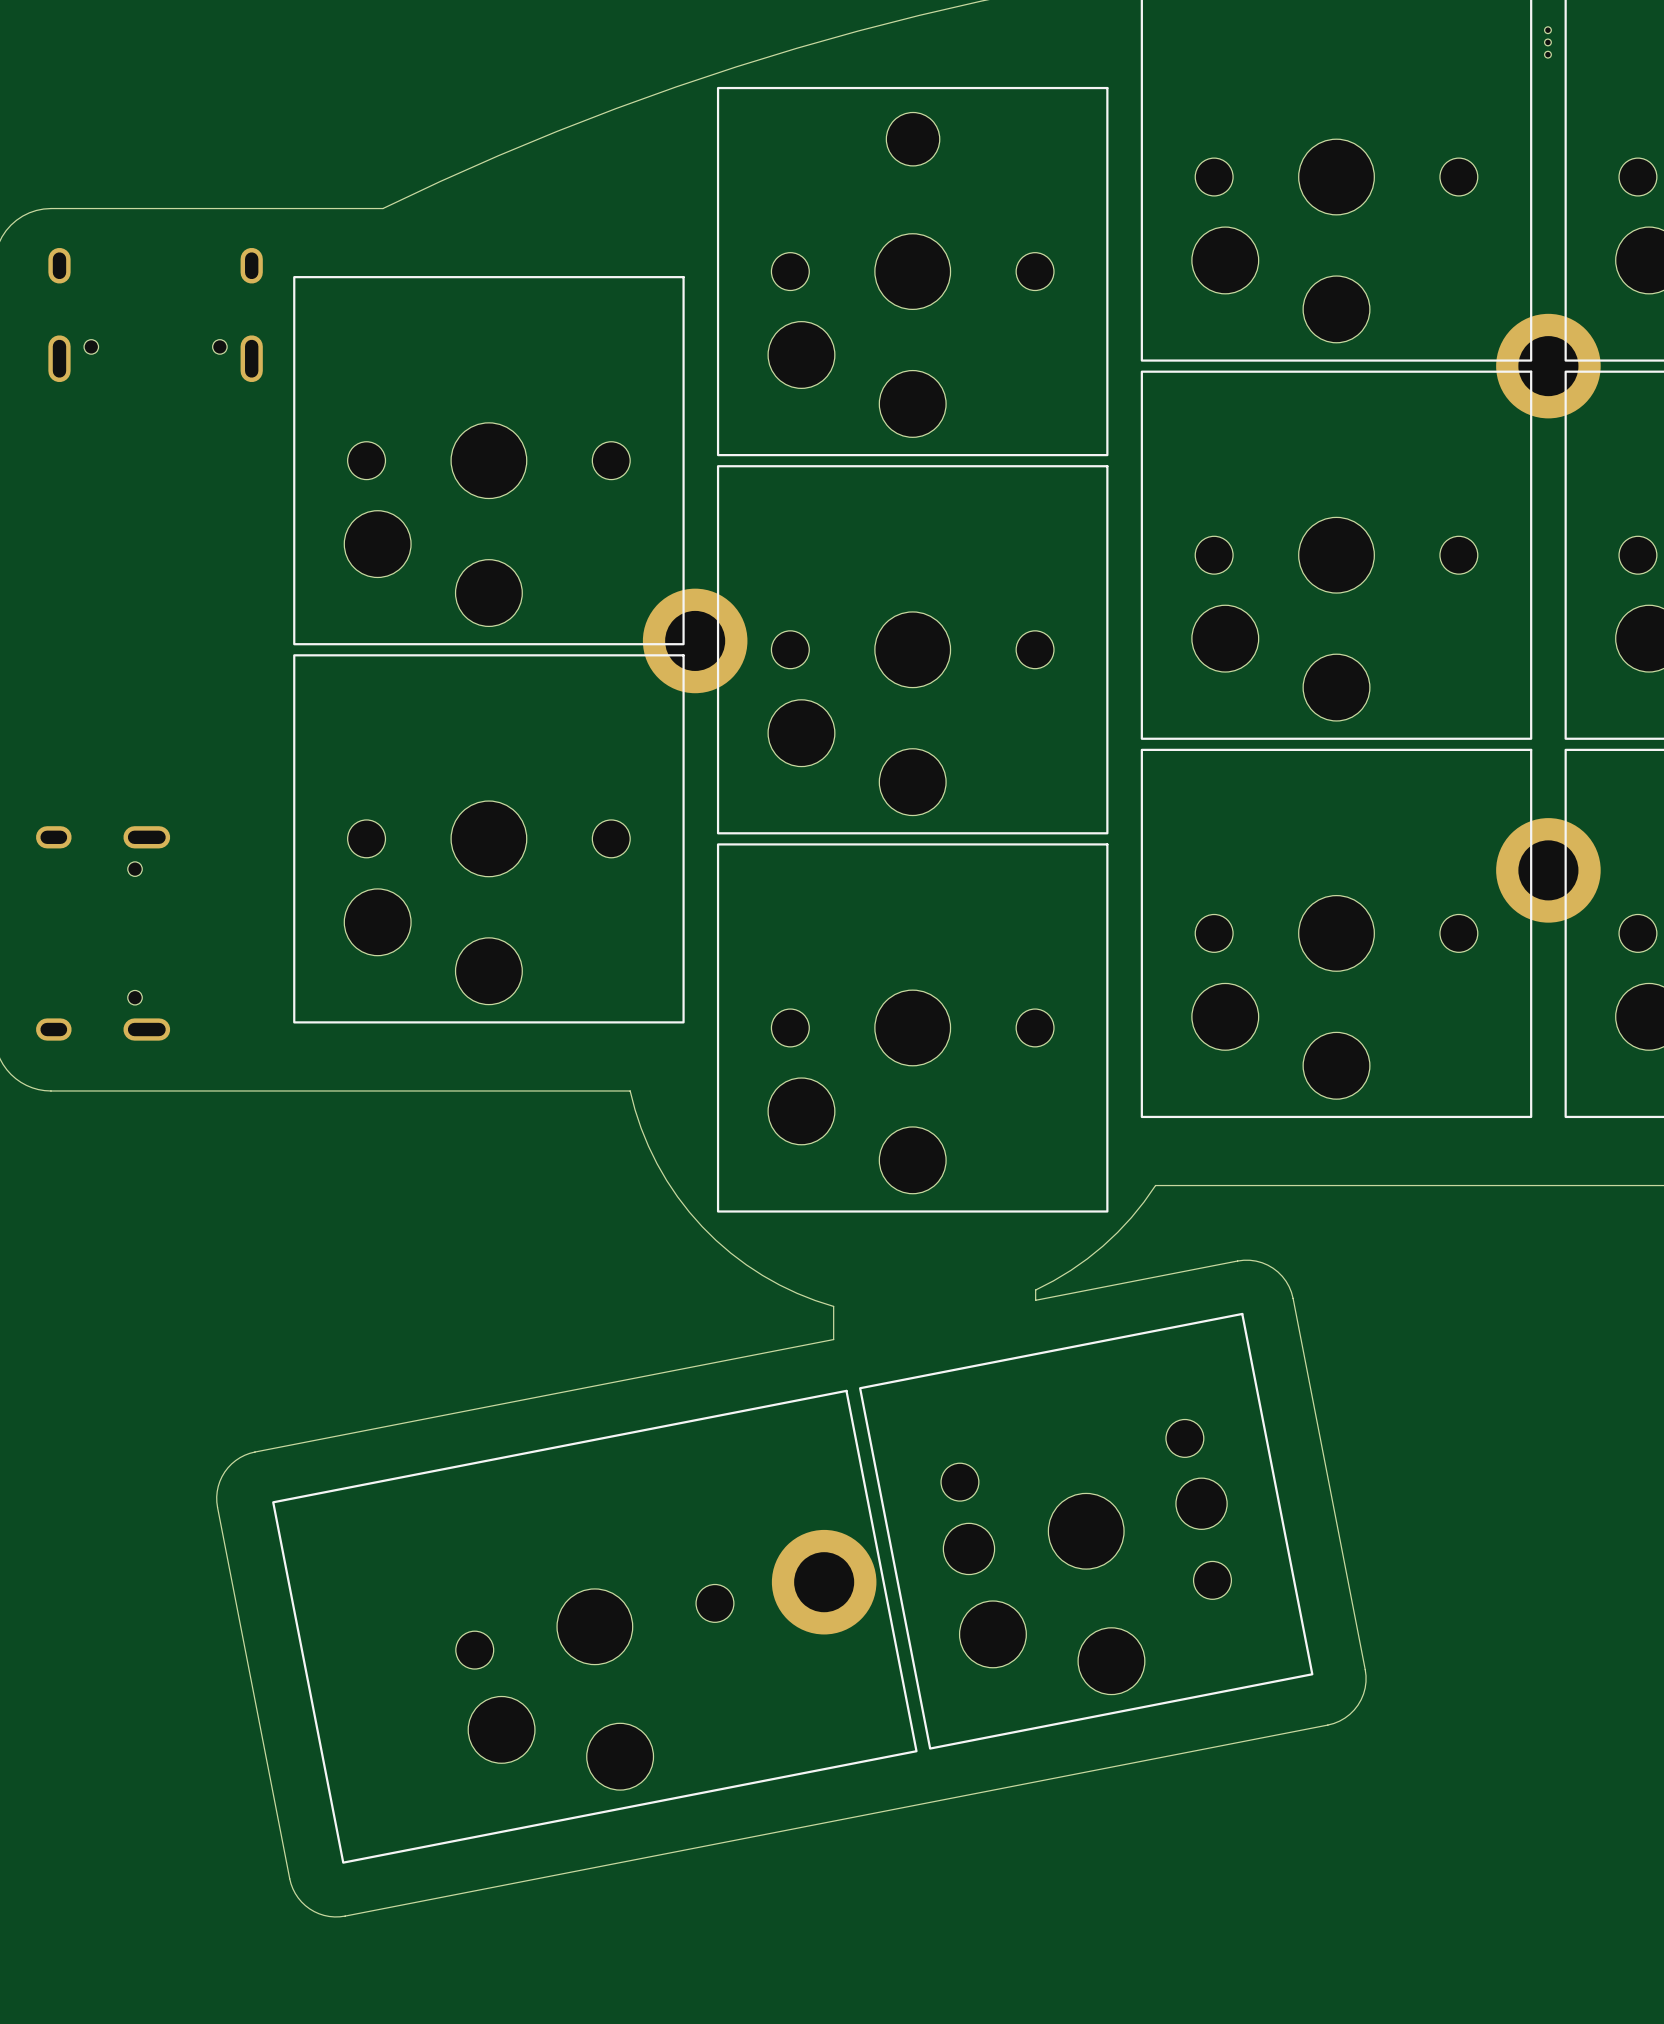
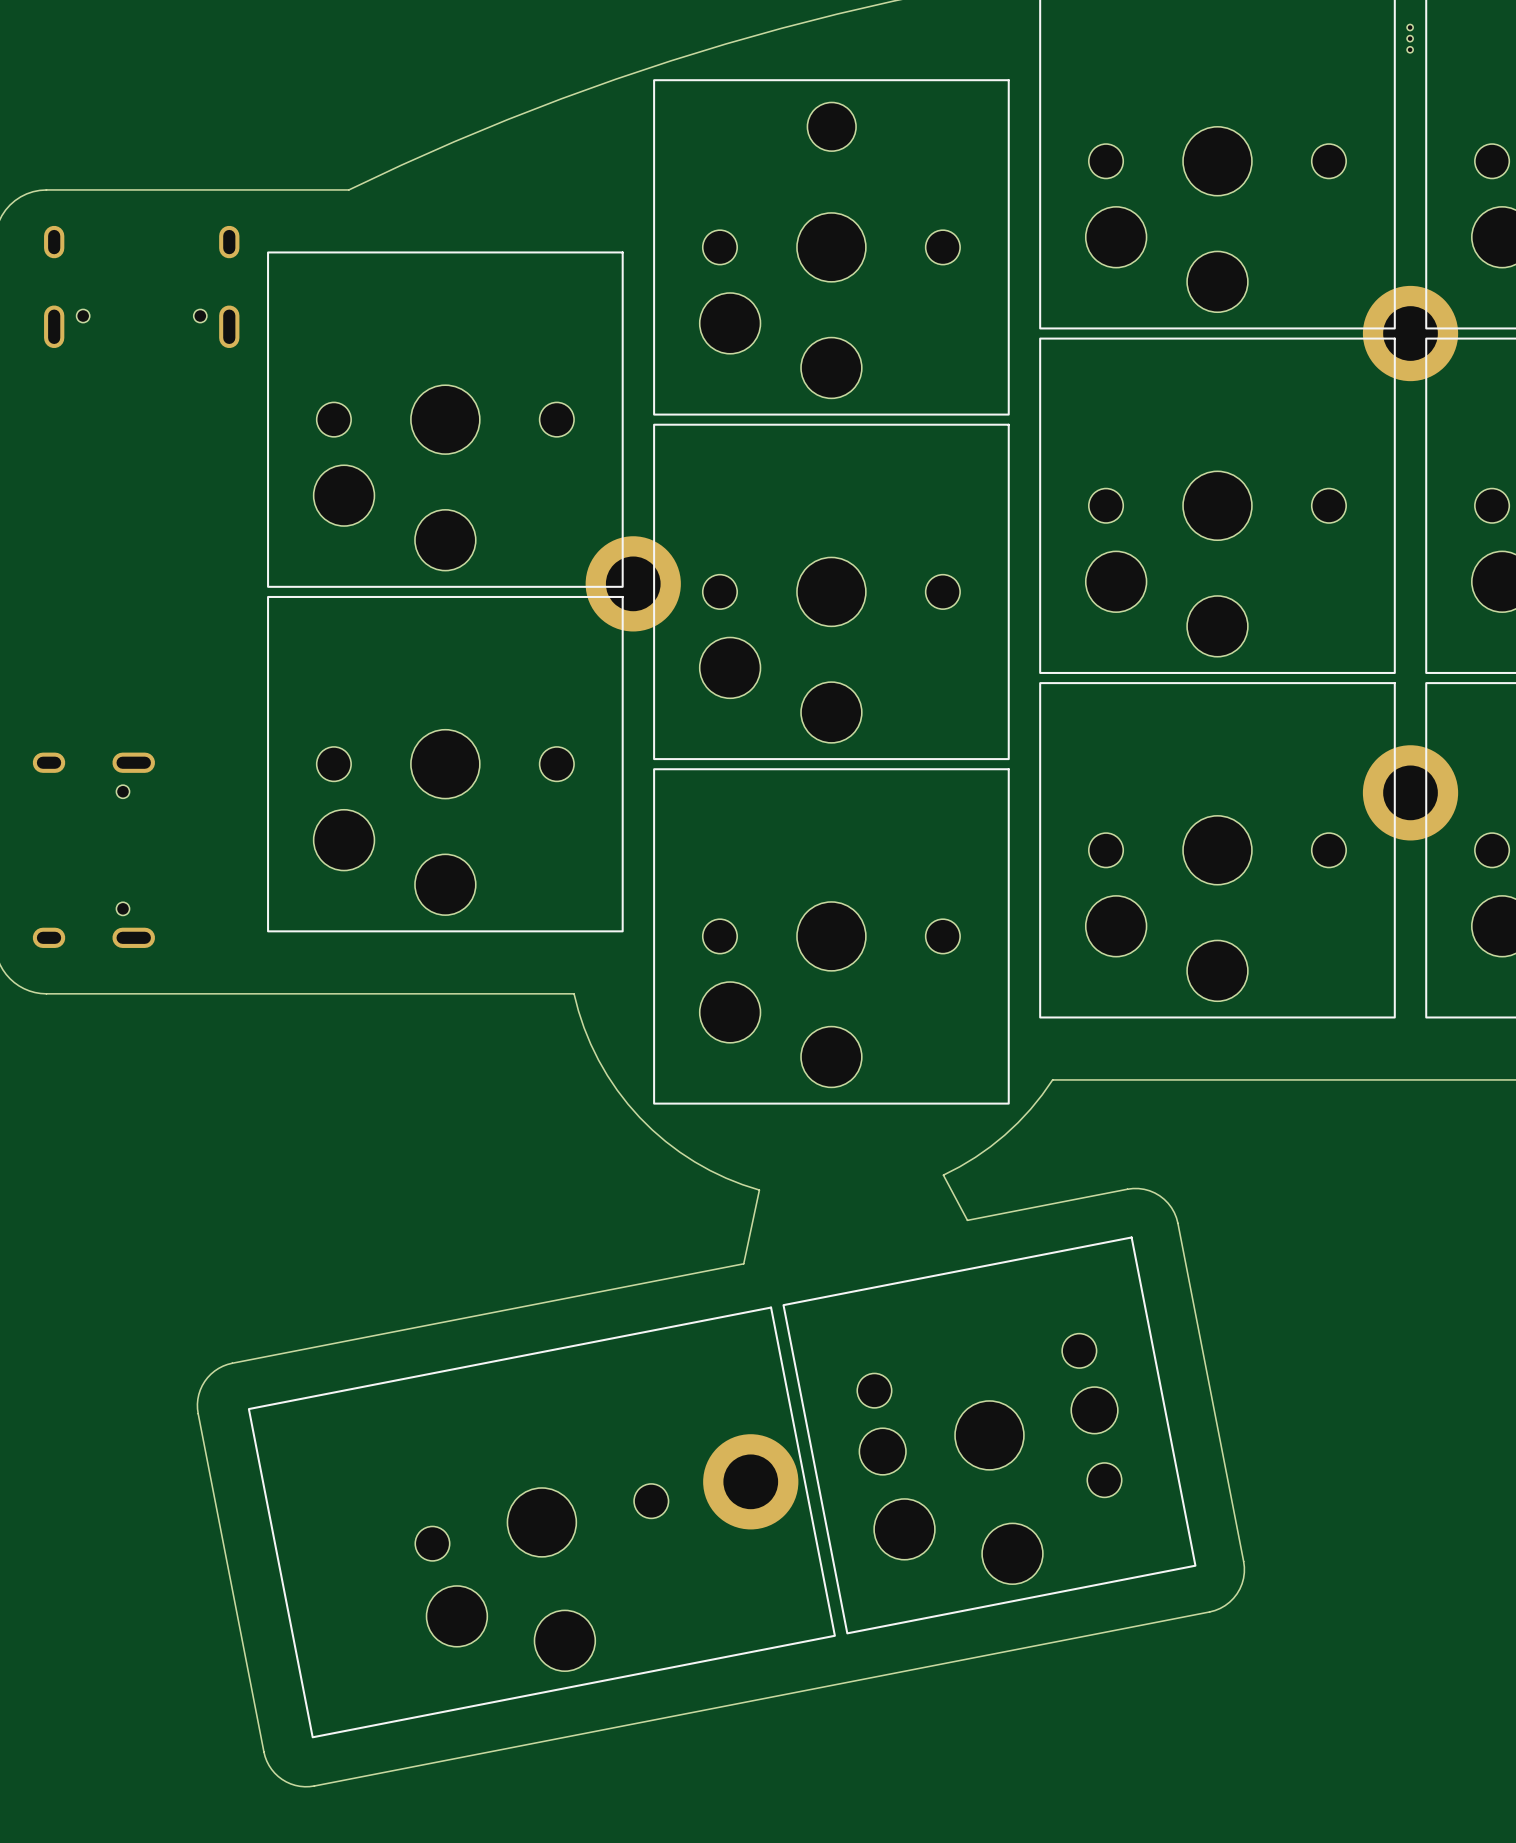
board edge: (1035, 1290) (1035, 1300) (1243, 1260) (1256, 1261) (1267, 1265) (1278, 1272) (1286, 1281) (1293, 1298) (1365, 1669) (1365, 1681) (1363, 1694) (1358, 1705) (1349, 1714) (1339, 1721) (1327, 1725) (345, 1916) (324, 1915) (305, 1905) (295, 1893) (289, 1878) (217, 1507) (218, 1486) (227, 1467) (240, 1457) (254, 1452) (833, 1339) (833, 1306) -> (943, 1175) (967, 1220) (1133, 1188) (1154, 1192) (1171, 1207) (1177, 1223) (1243, 1561) (1242, 1583) (1229, 1602) (1209, 1611) (314, 1785) (295, 1785) (278, 1776) (269, 1765) (263, 1751) (198, 1413) (198, 1394) (207, 1377) (218, 1368) (232, 1363) (743, 1263) (759, 1190)
part position: (1086, 1531) -> (989, 1435)
part position: (824, 1582) -> (750, 1481)
part position: (594, 1626) -> (541, 1522)

